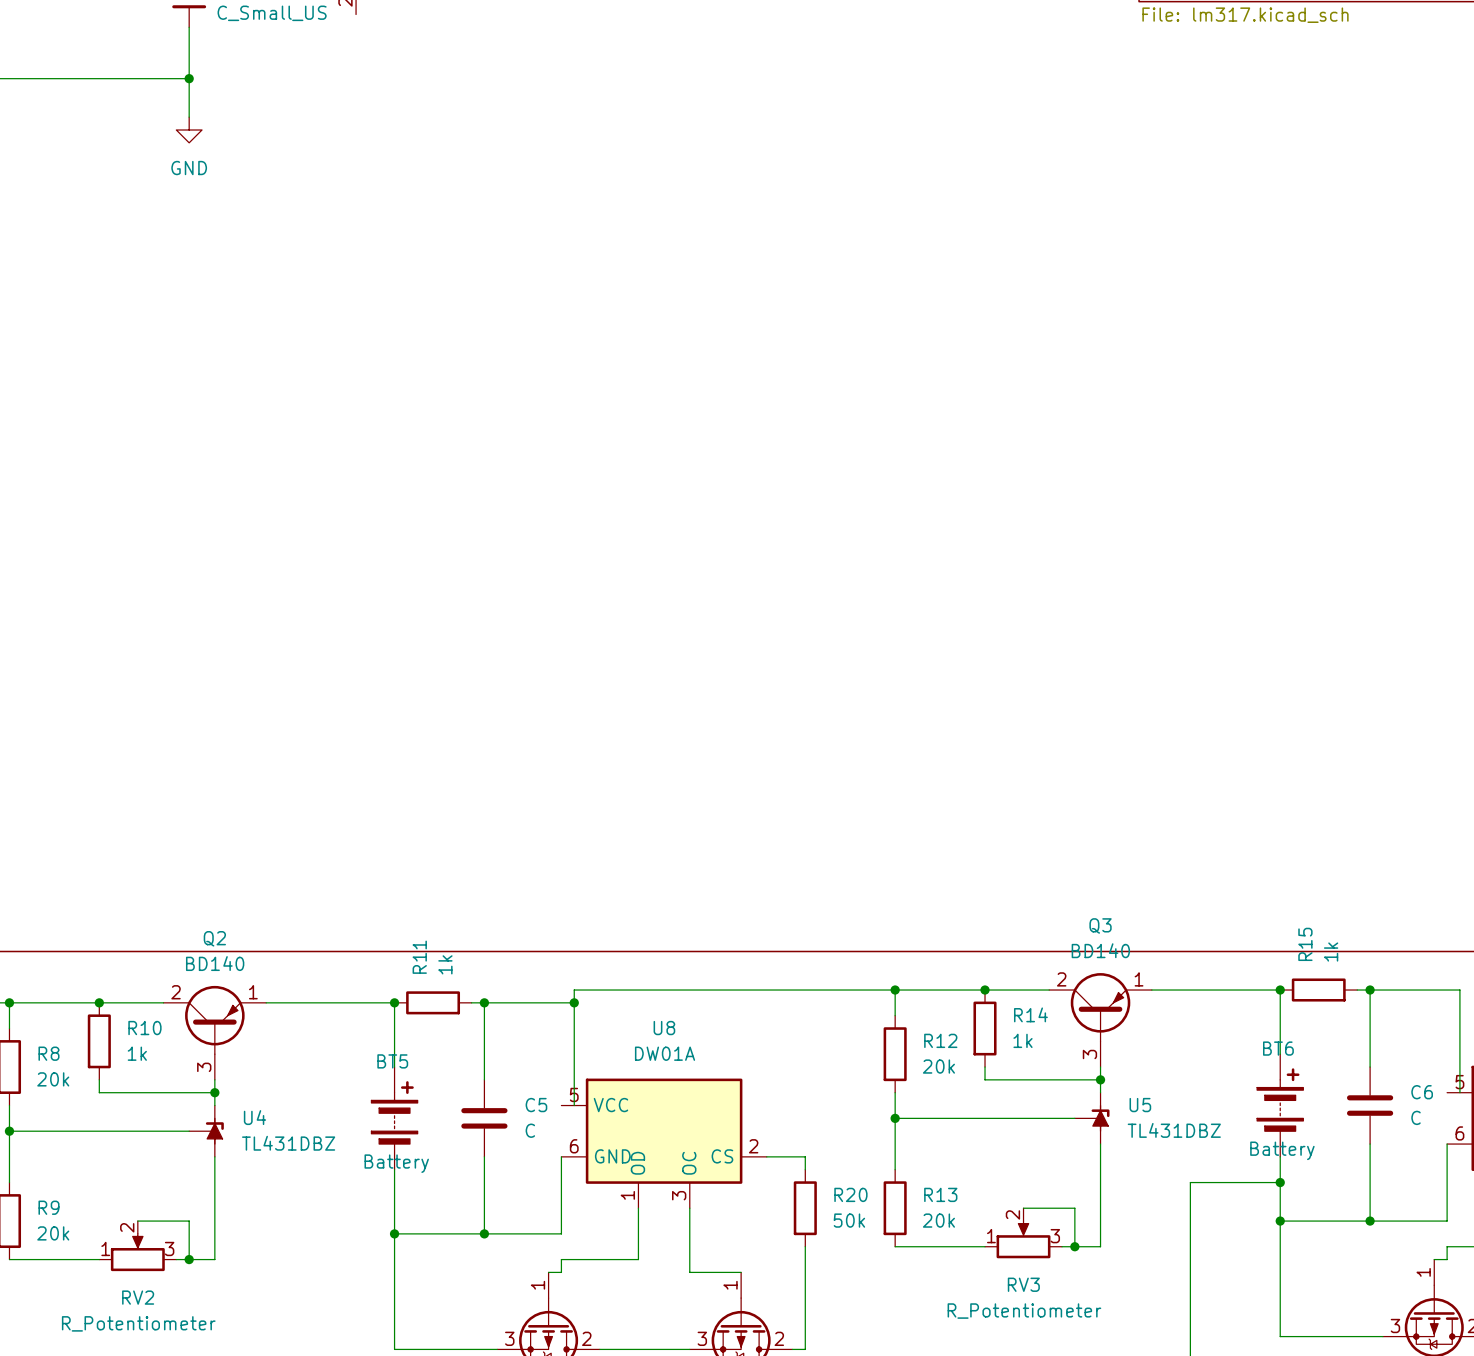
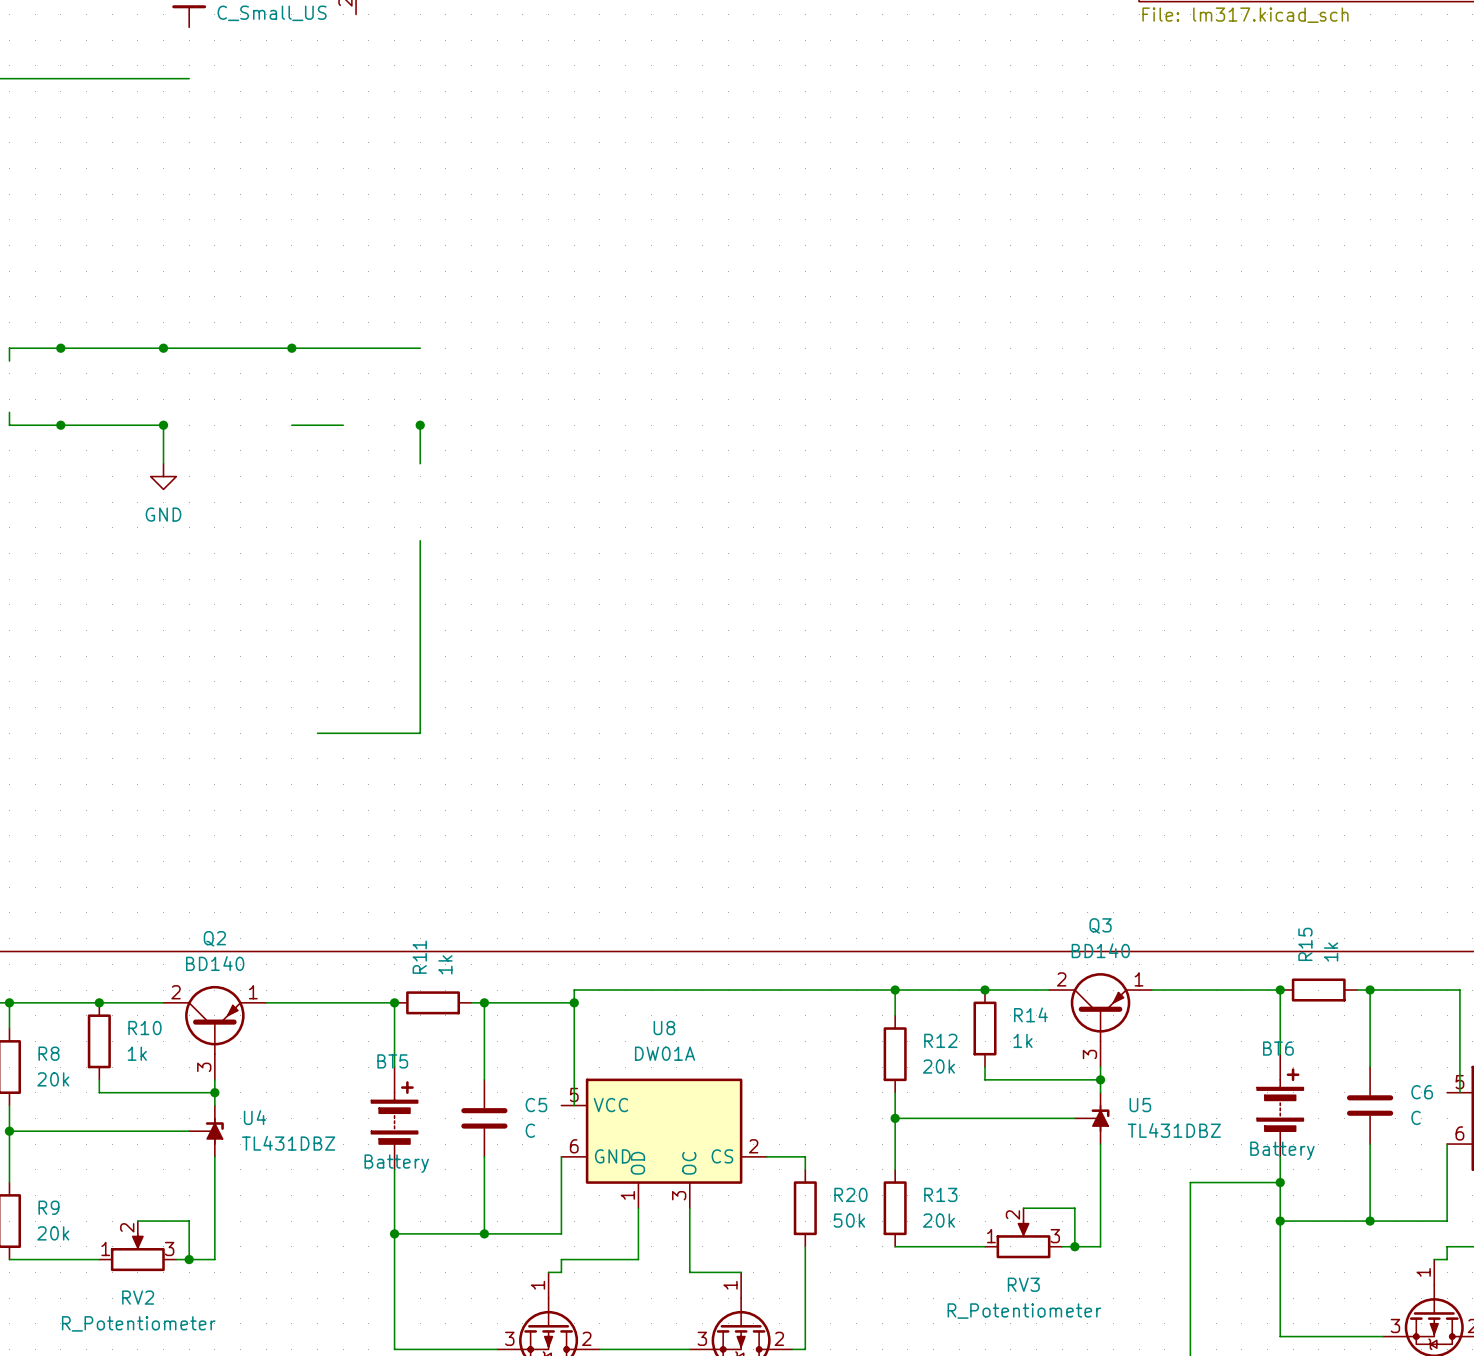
wire: (189, 27) (189, 117) -> none
junction: (189, 78) -> none
power symbol: GND (189, 130) -> none
junction: none -> (60, 348)
junction: none -> (163, 348)
junction: none -> (291, 348)
wire: none -> (420, 348) (9, 348) (9, 361)
wire: none -> (9, 412) (9, 425) (163, 425) (163, 463)
junction: none -> (60, 425)
junction: none -> (163, 425)
wire: none -> (291, 425) (343, 425)
wire: none -> (420, 425) (420, 463)
junction: none -> (420, 425)
power symbol: none -> GND (163, 476)
wire: none -> (420, 540) (420, 733) (317, 733)

